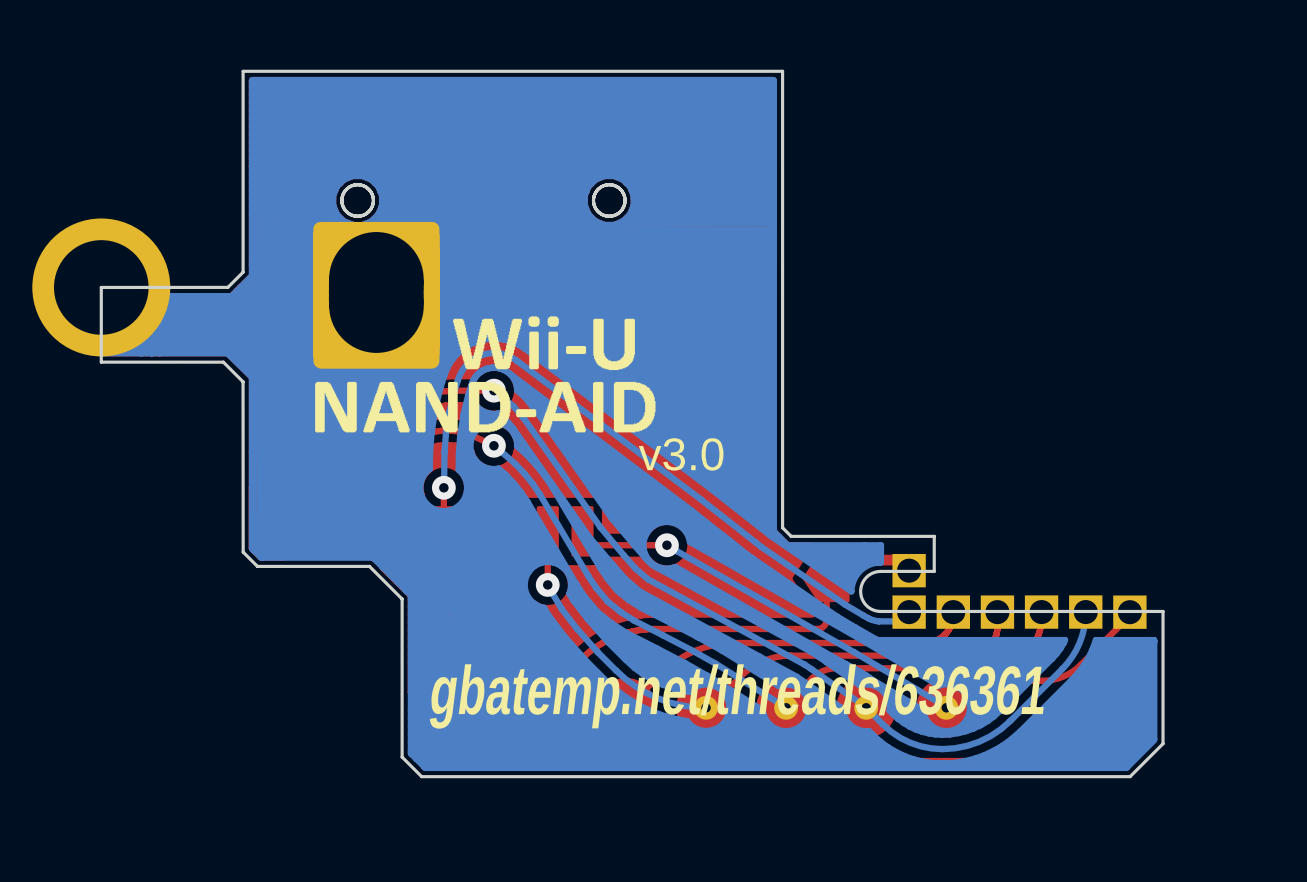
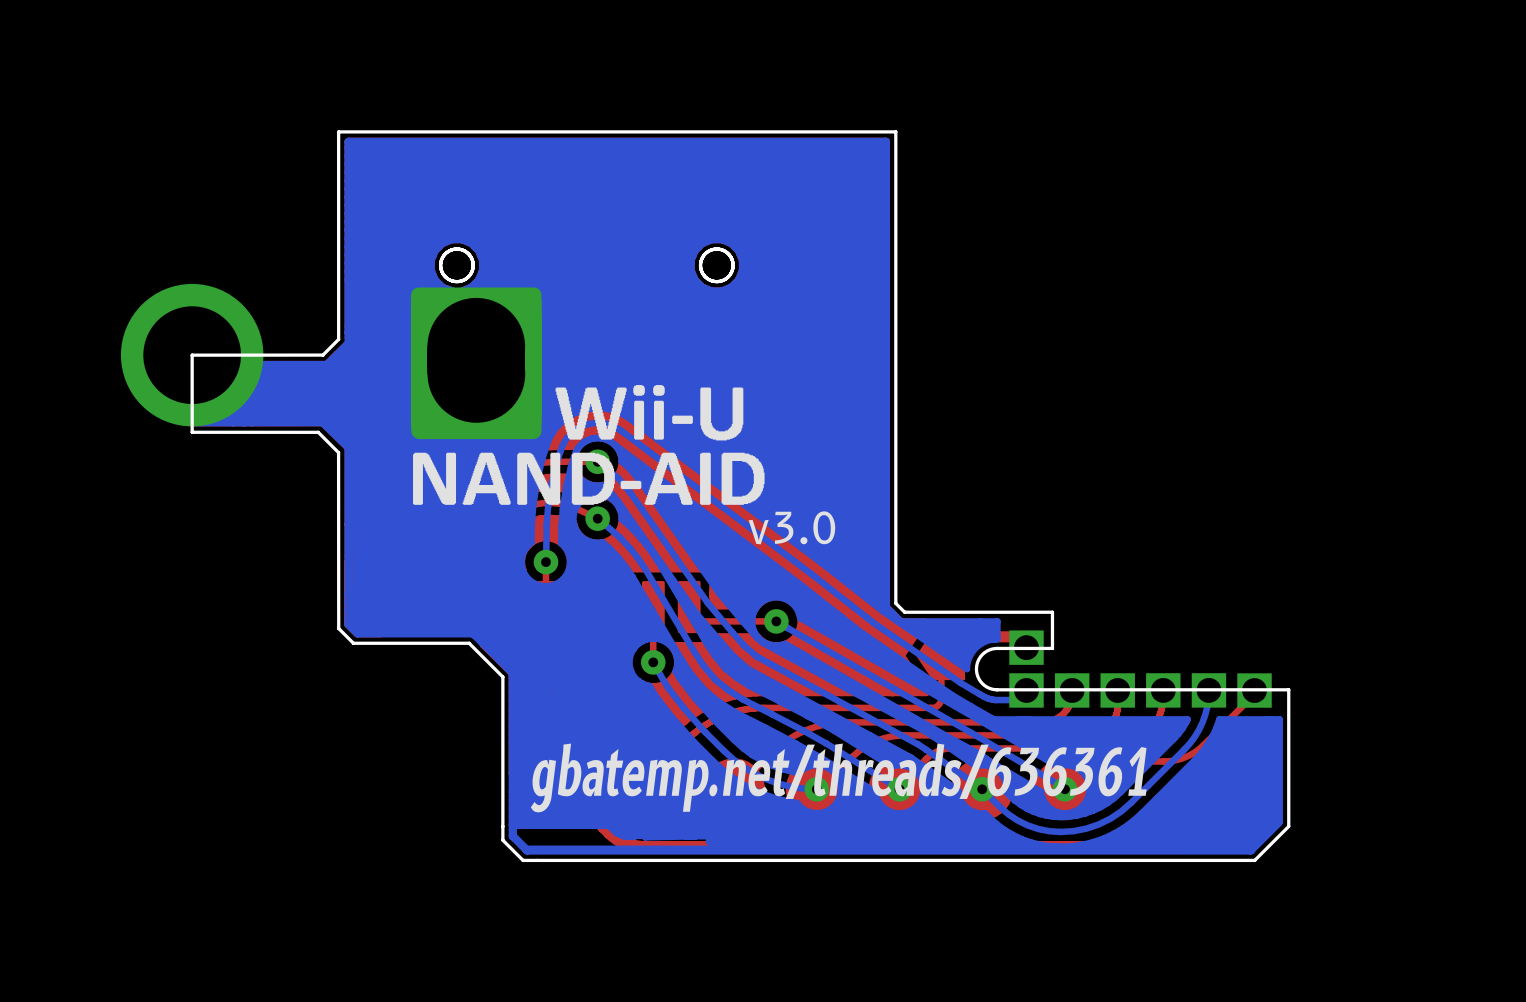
bottom track: (514, 750) (411, 750) -> none
bottom track: (602, 758) (416, 758) -> none

